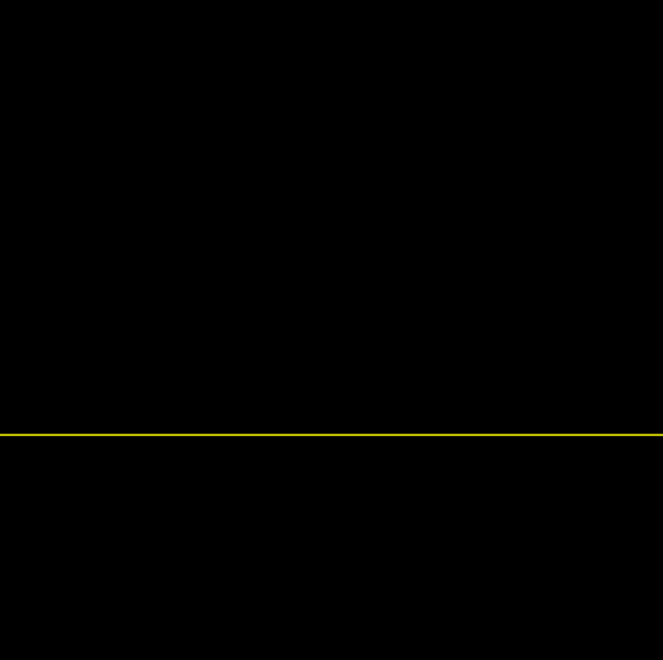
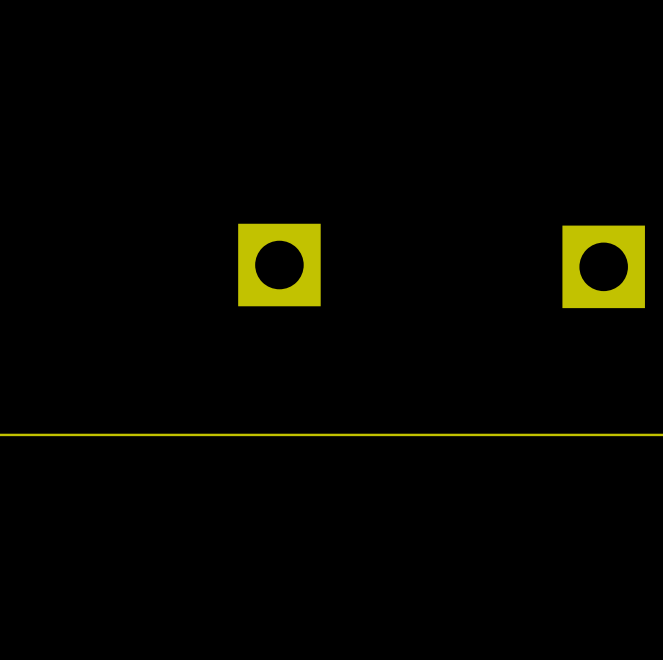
part: none -> (279, 265)
part: none -> (603, 266)

